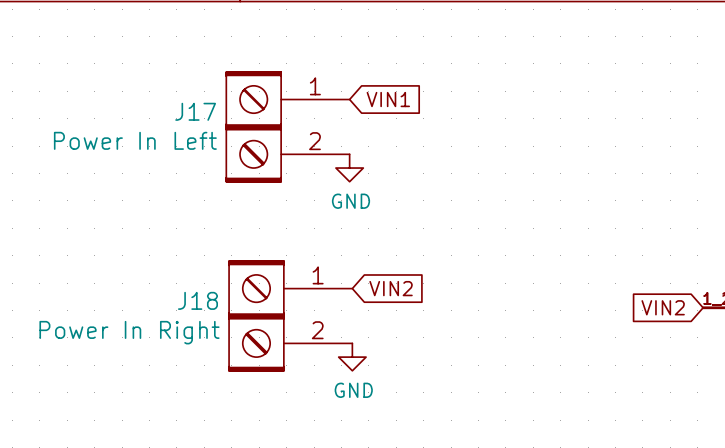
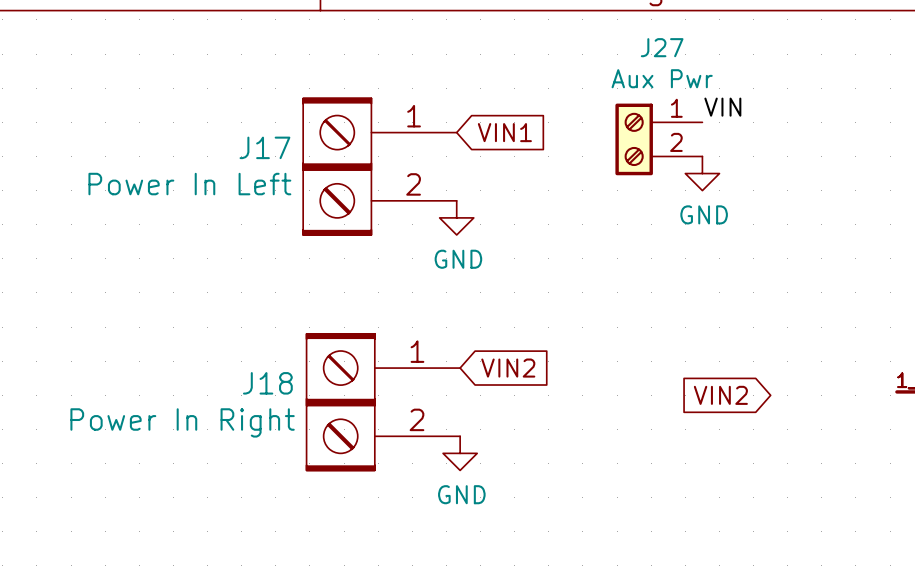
label: none -> VIN (722, 107)
J27: none -> Aux Pwr (658, 139)
power symbol: none -> GND (702, 173)
global label position: VIN2 (663, 307) -> VIN2 (720, 395)

